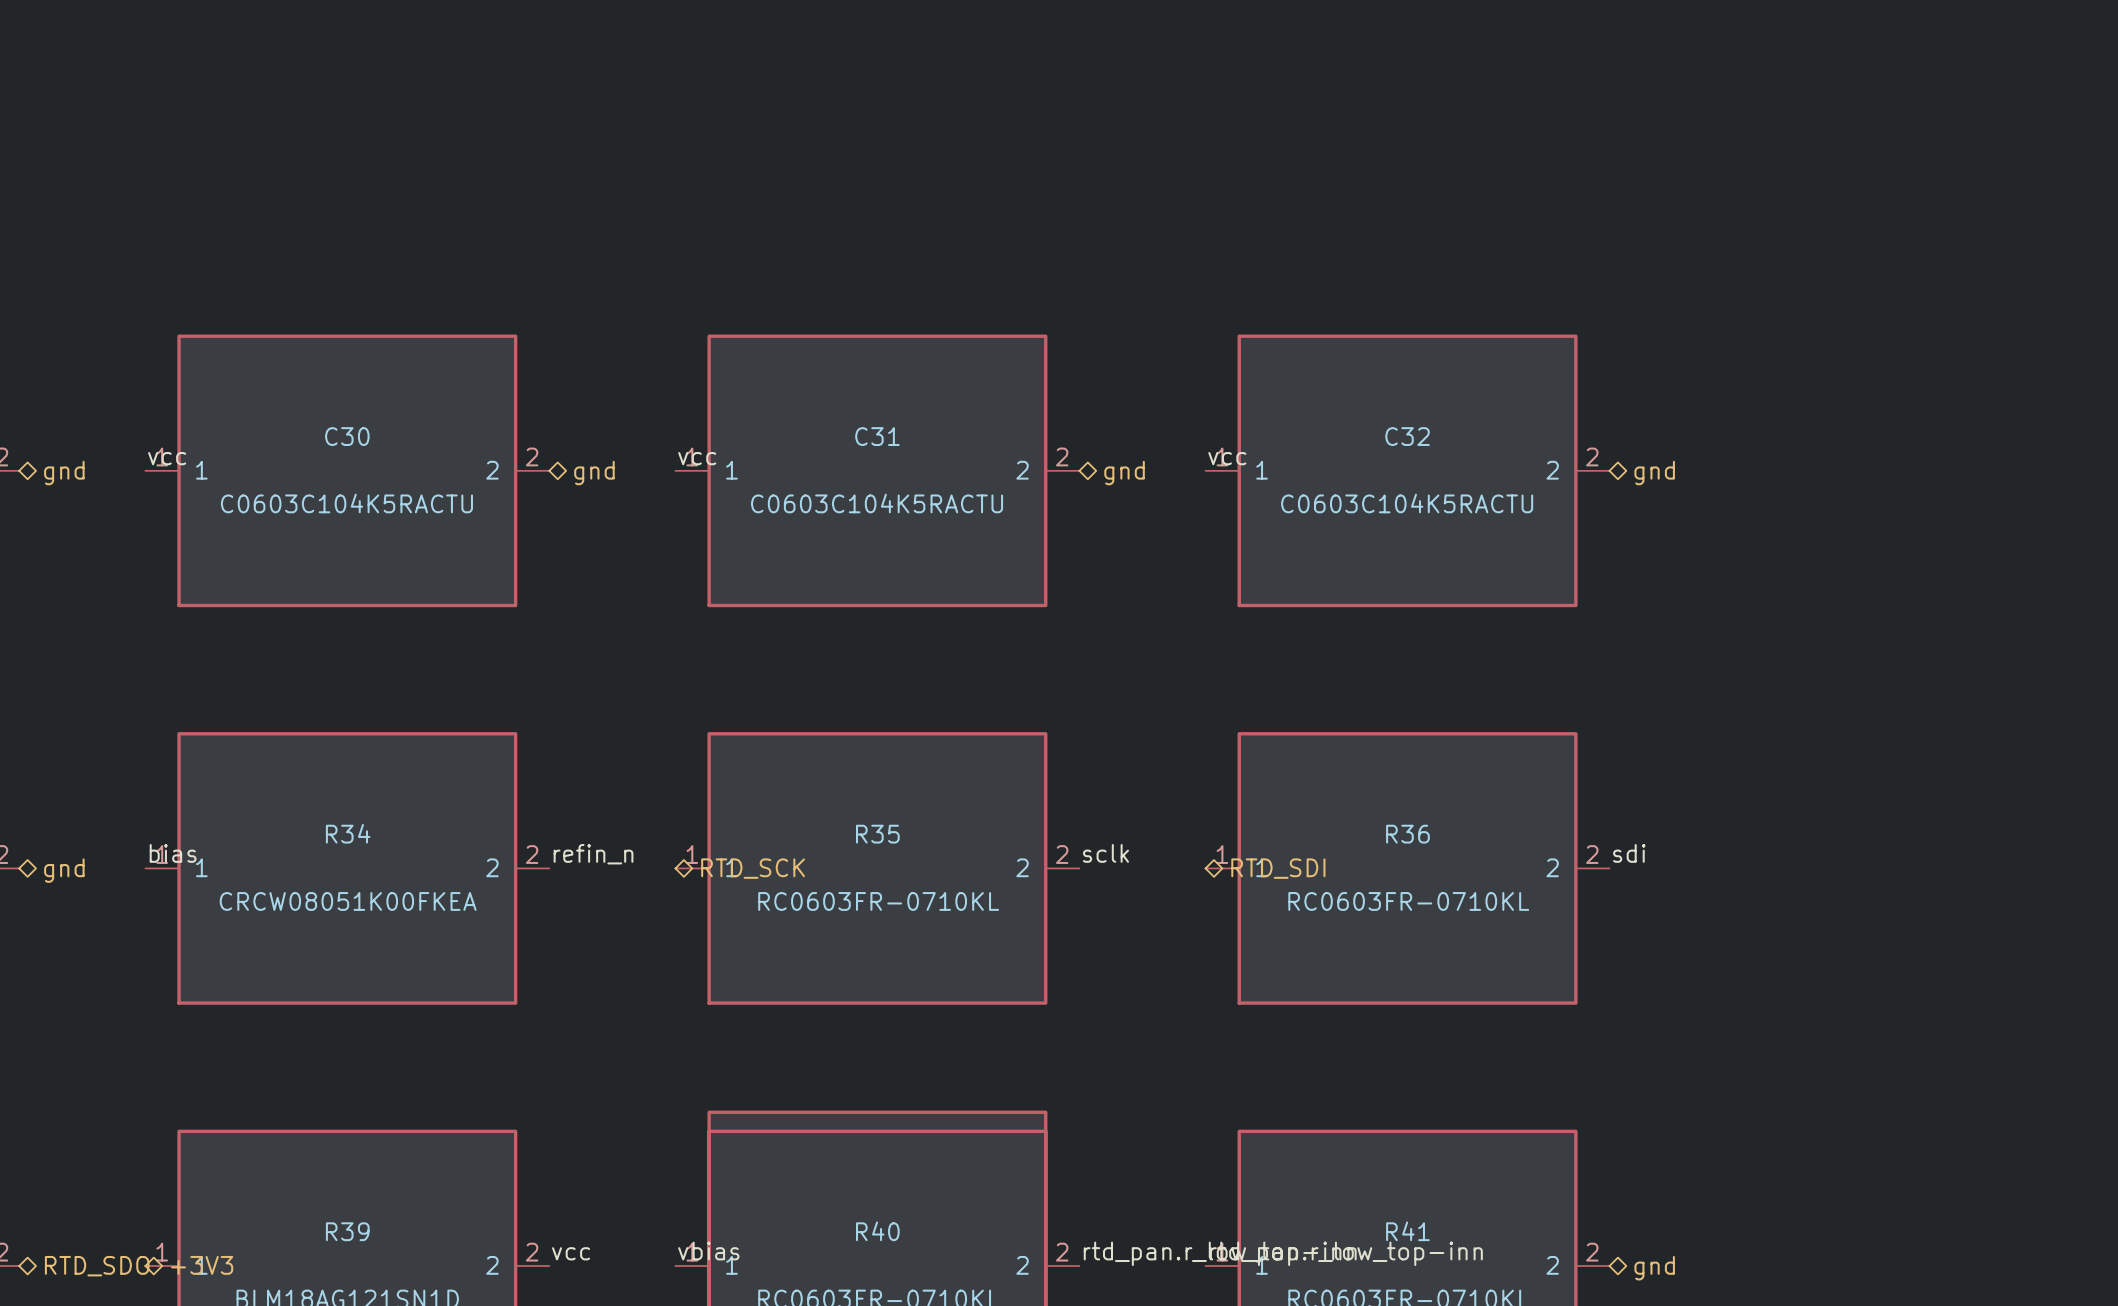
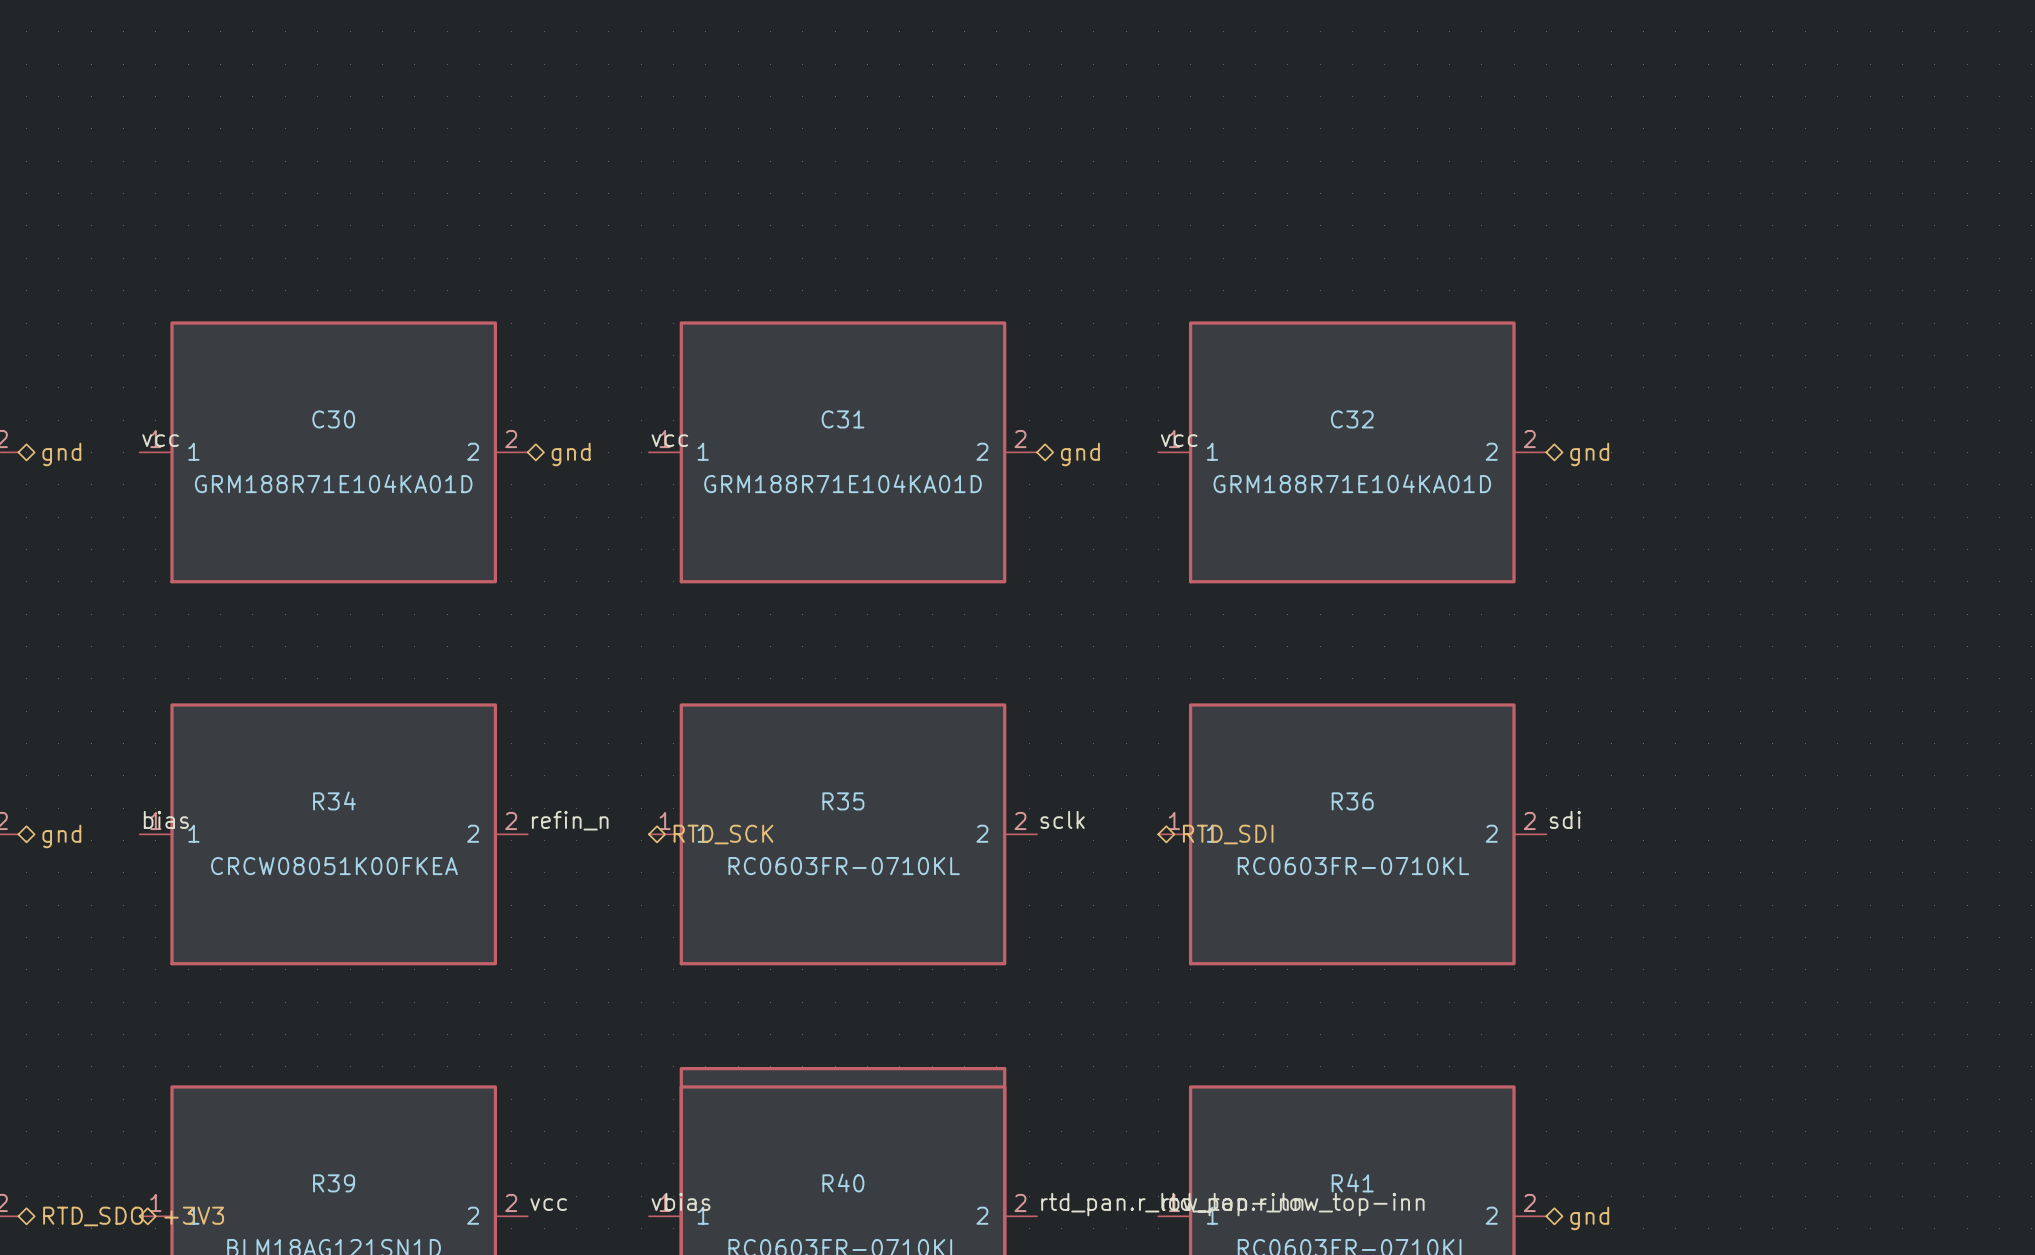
C30 value: C0603C104K5RACTU (346, 503) -> GRM188R71E104KA01D (333, 483)
C31 value: C0603C104K5RACTU (877, 503) -> GRM188R71E104KA01D (843, 483)
C32 value: C0603C104K5RACTU (1407, 503) -> GRM188R71E104KA01D (1352, 483)

